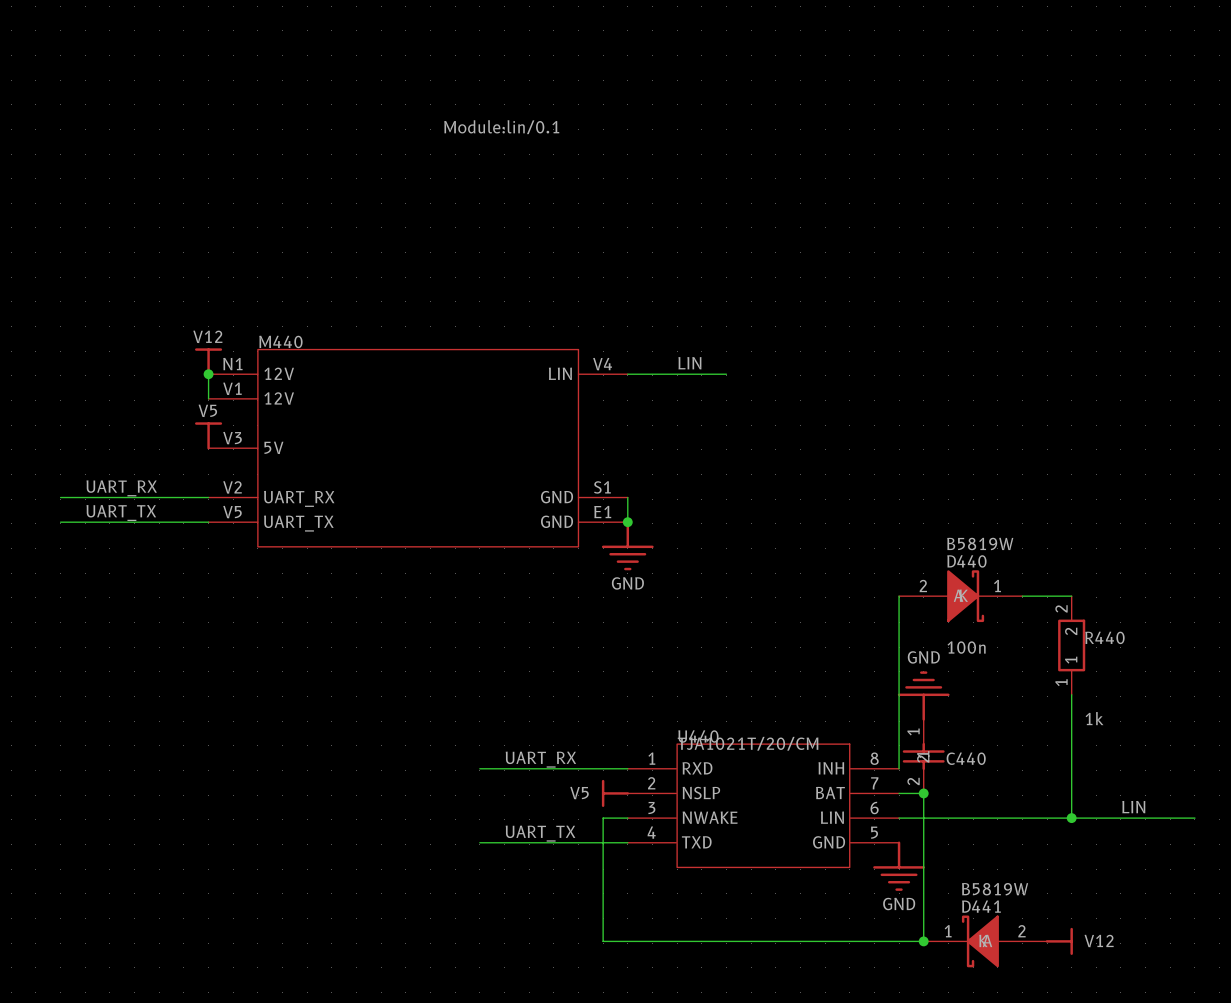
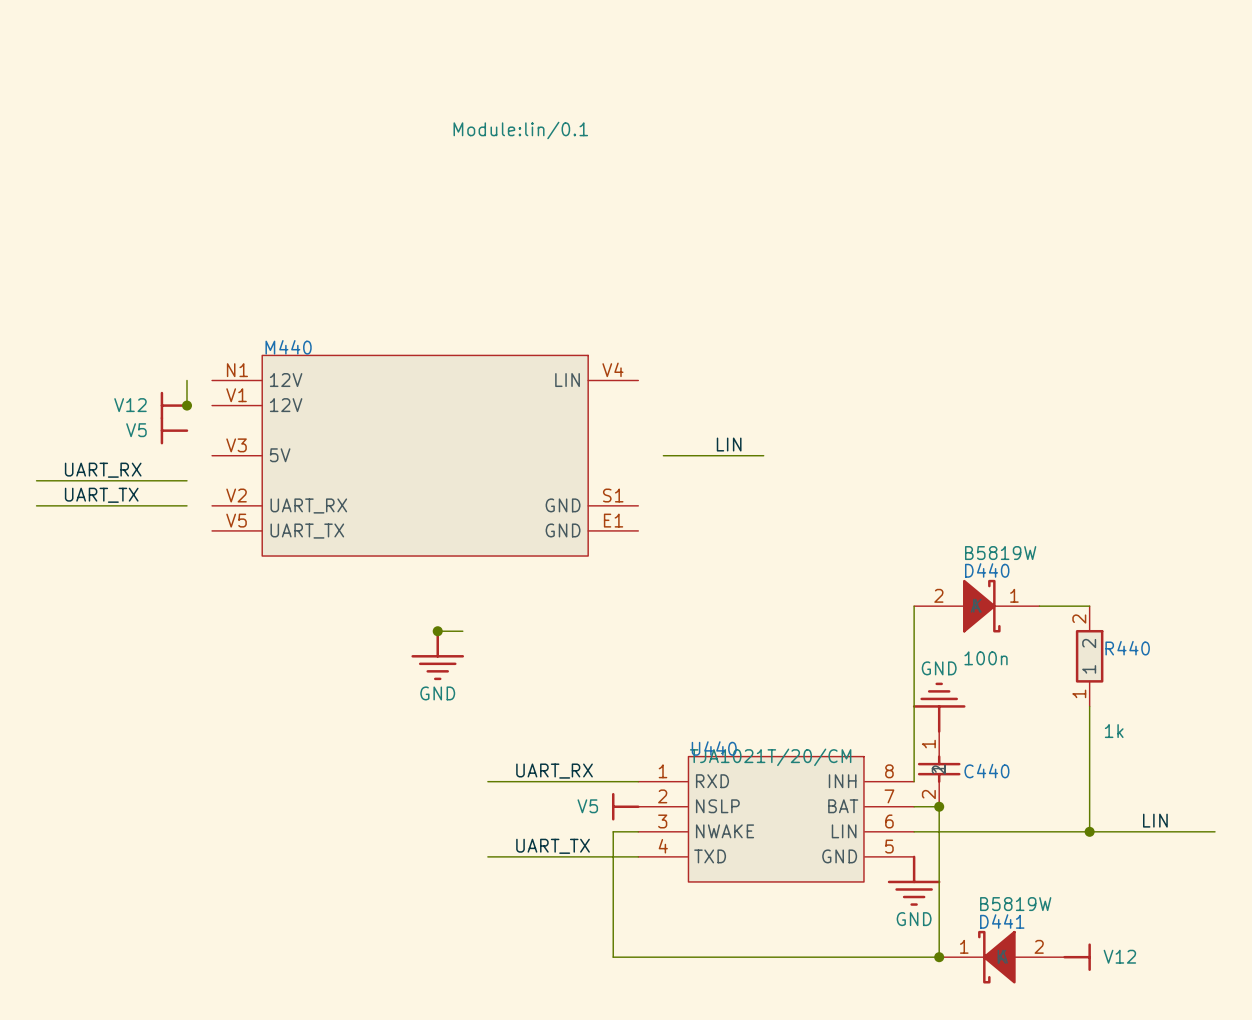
power symbol text position: V12 (207, 336) -> V12 (130, 405)
power symbol rotation: 0° (208, 361) -> 90° counterclockwise (174, 405)
power symbol position: V12 (208, 361) -> V12 (174, 405)
label position: LIN (689, 363) -> LIN (729, 444)
wire: (208, 374) (208, 398) -> (186, 380) (186, 405)
junction position: (208, 374) -> (186, 405)
wire: (627, 374) (726, 374) -> (663, 455) (763, 455)
power symbol rotation: 0° (208, 435) -> 90° counterclockwise (174, 430)
power symbol position: V5 (208, 435) -> V5 (174, 430)
label position: UART_RX (121, 488) -> UART_RX (103, 470)
wire: (183, 497) (208, 497) -> (36, 505) (61, 505)
wire: (627, 497) (627, 522) -> none
label position: UART_TX (121, 513) -> UART_TX (101, 495)
wire: (60, 522) (208, 522) -> (36, 480) (186, 480)
junction: (627, 522) -> none
power symbol position: GND (627, 545) -> GND (437, 655)
wire: none -> (437, 631) (462, 631)
junction: none -> (437, 631)

